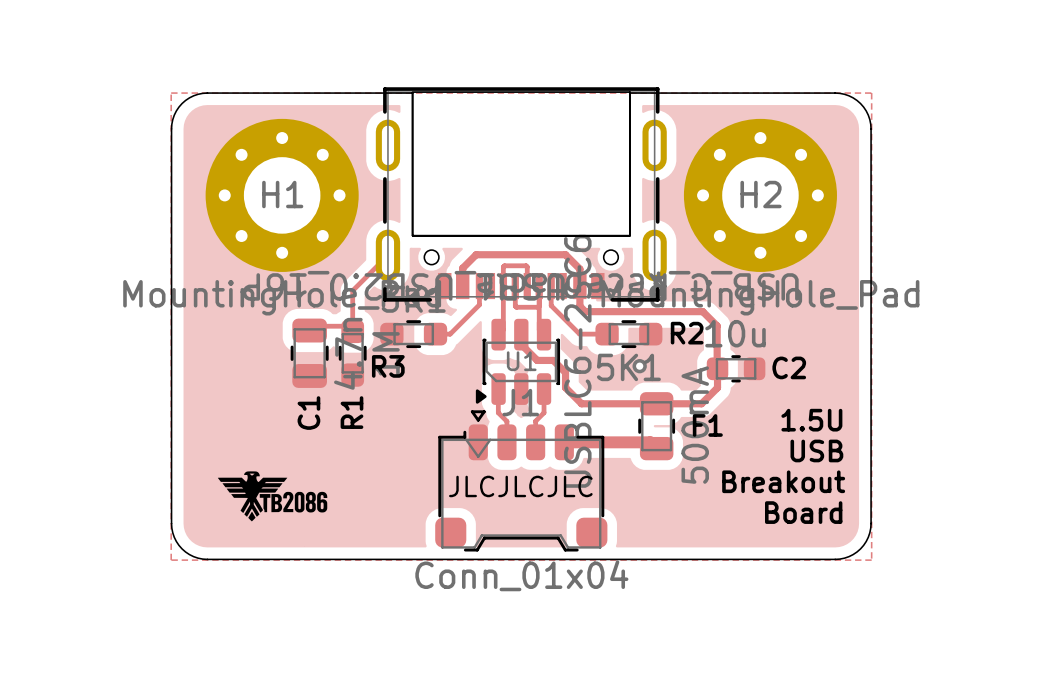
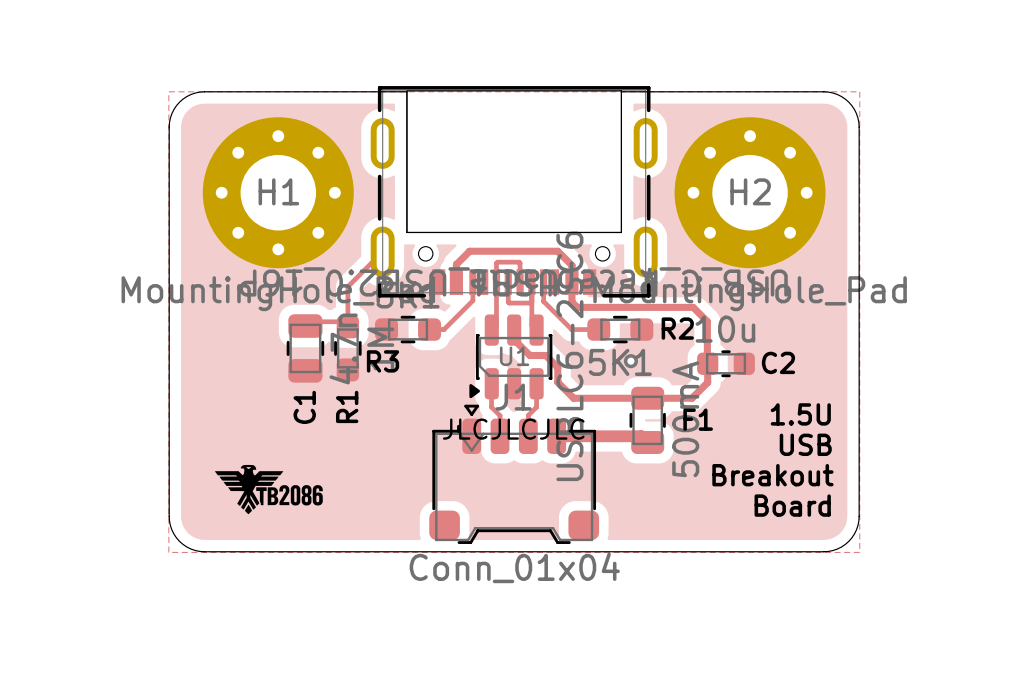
text position: JLCJLCJLC (520, 486) -> JLCJLCJLC (513, 429)

